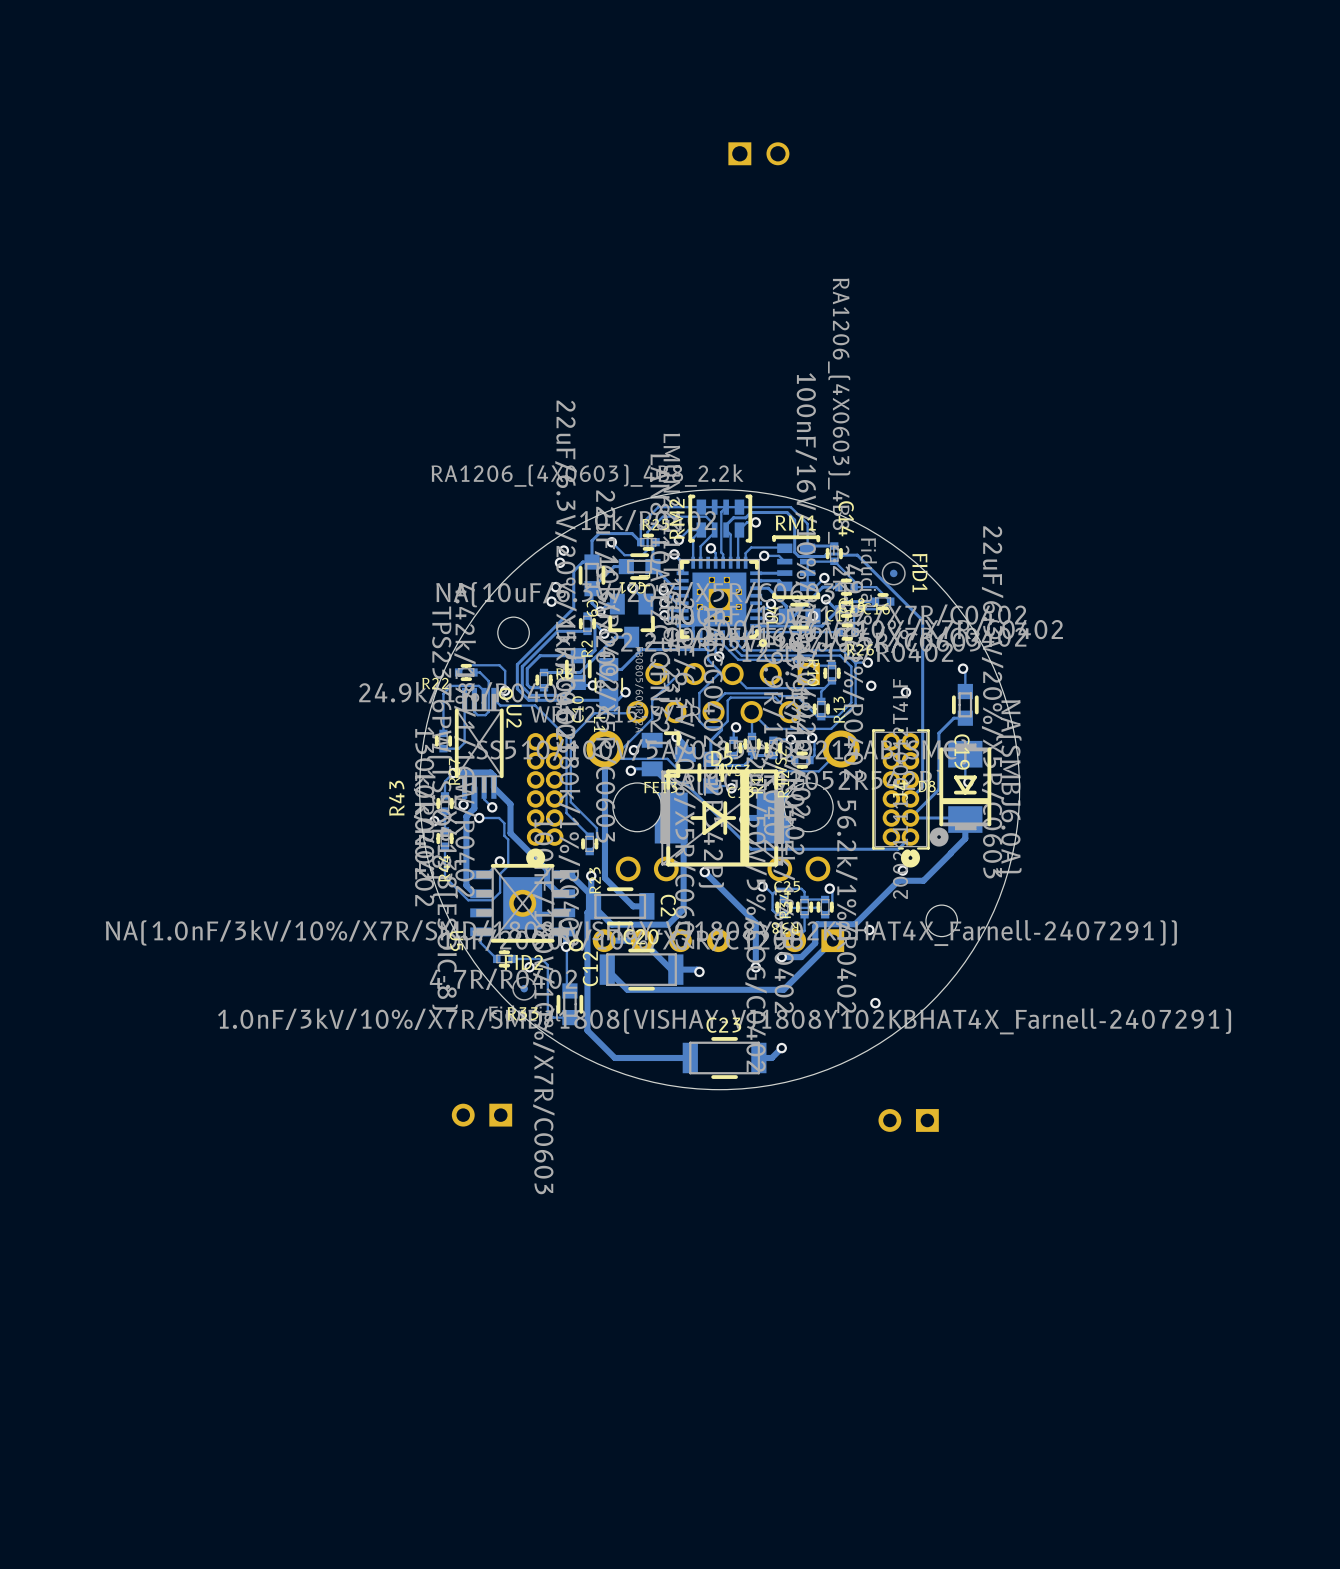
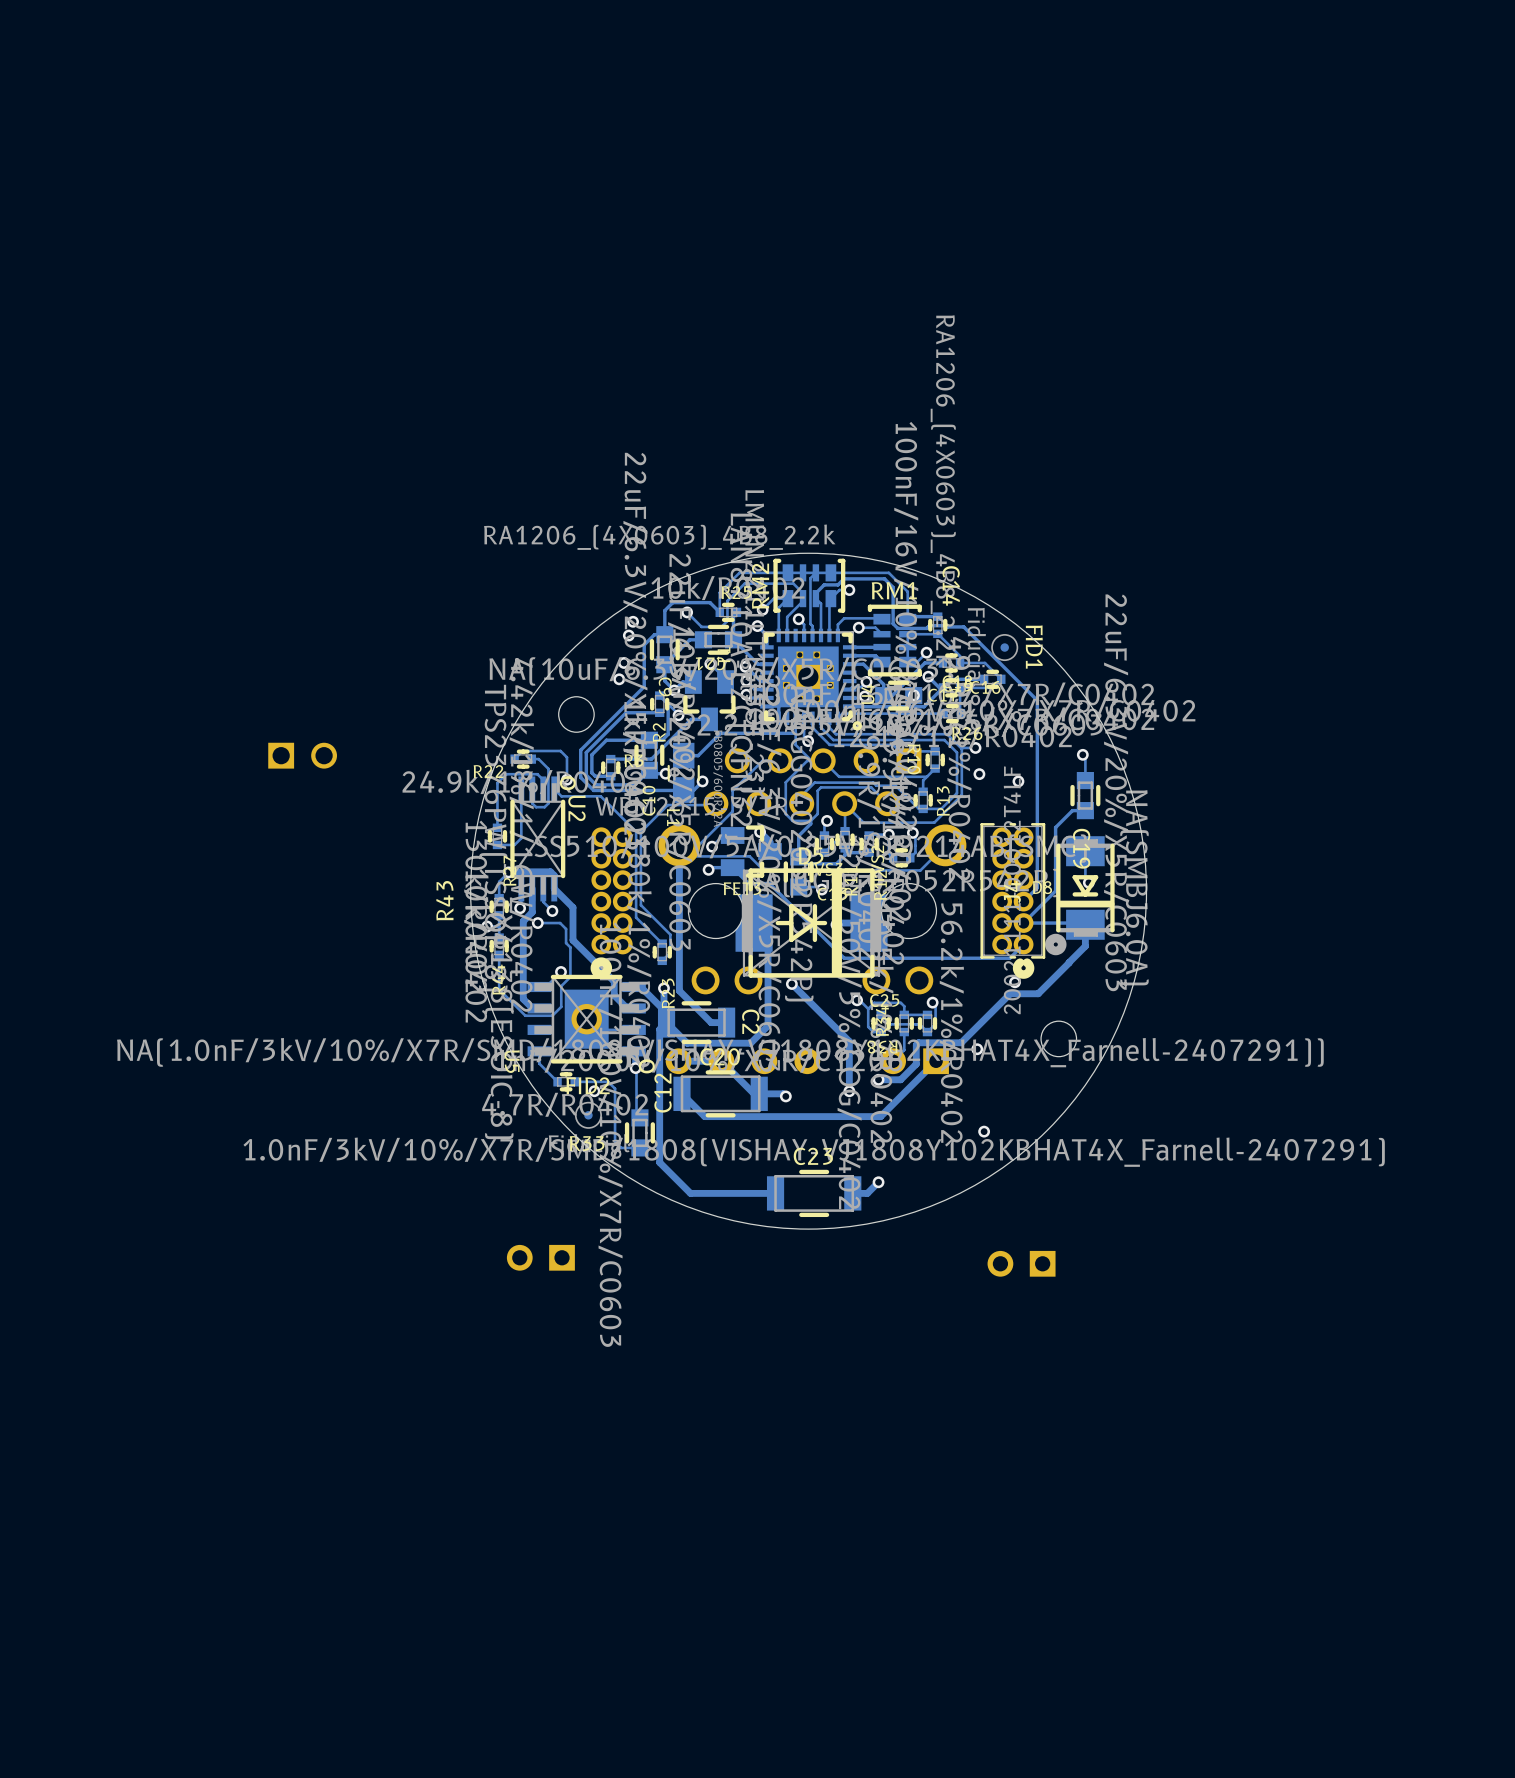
part: (758, 153) -> none
part: none -> (302, 755)

